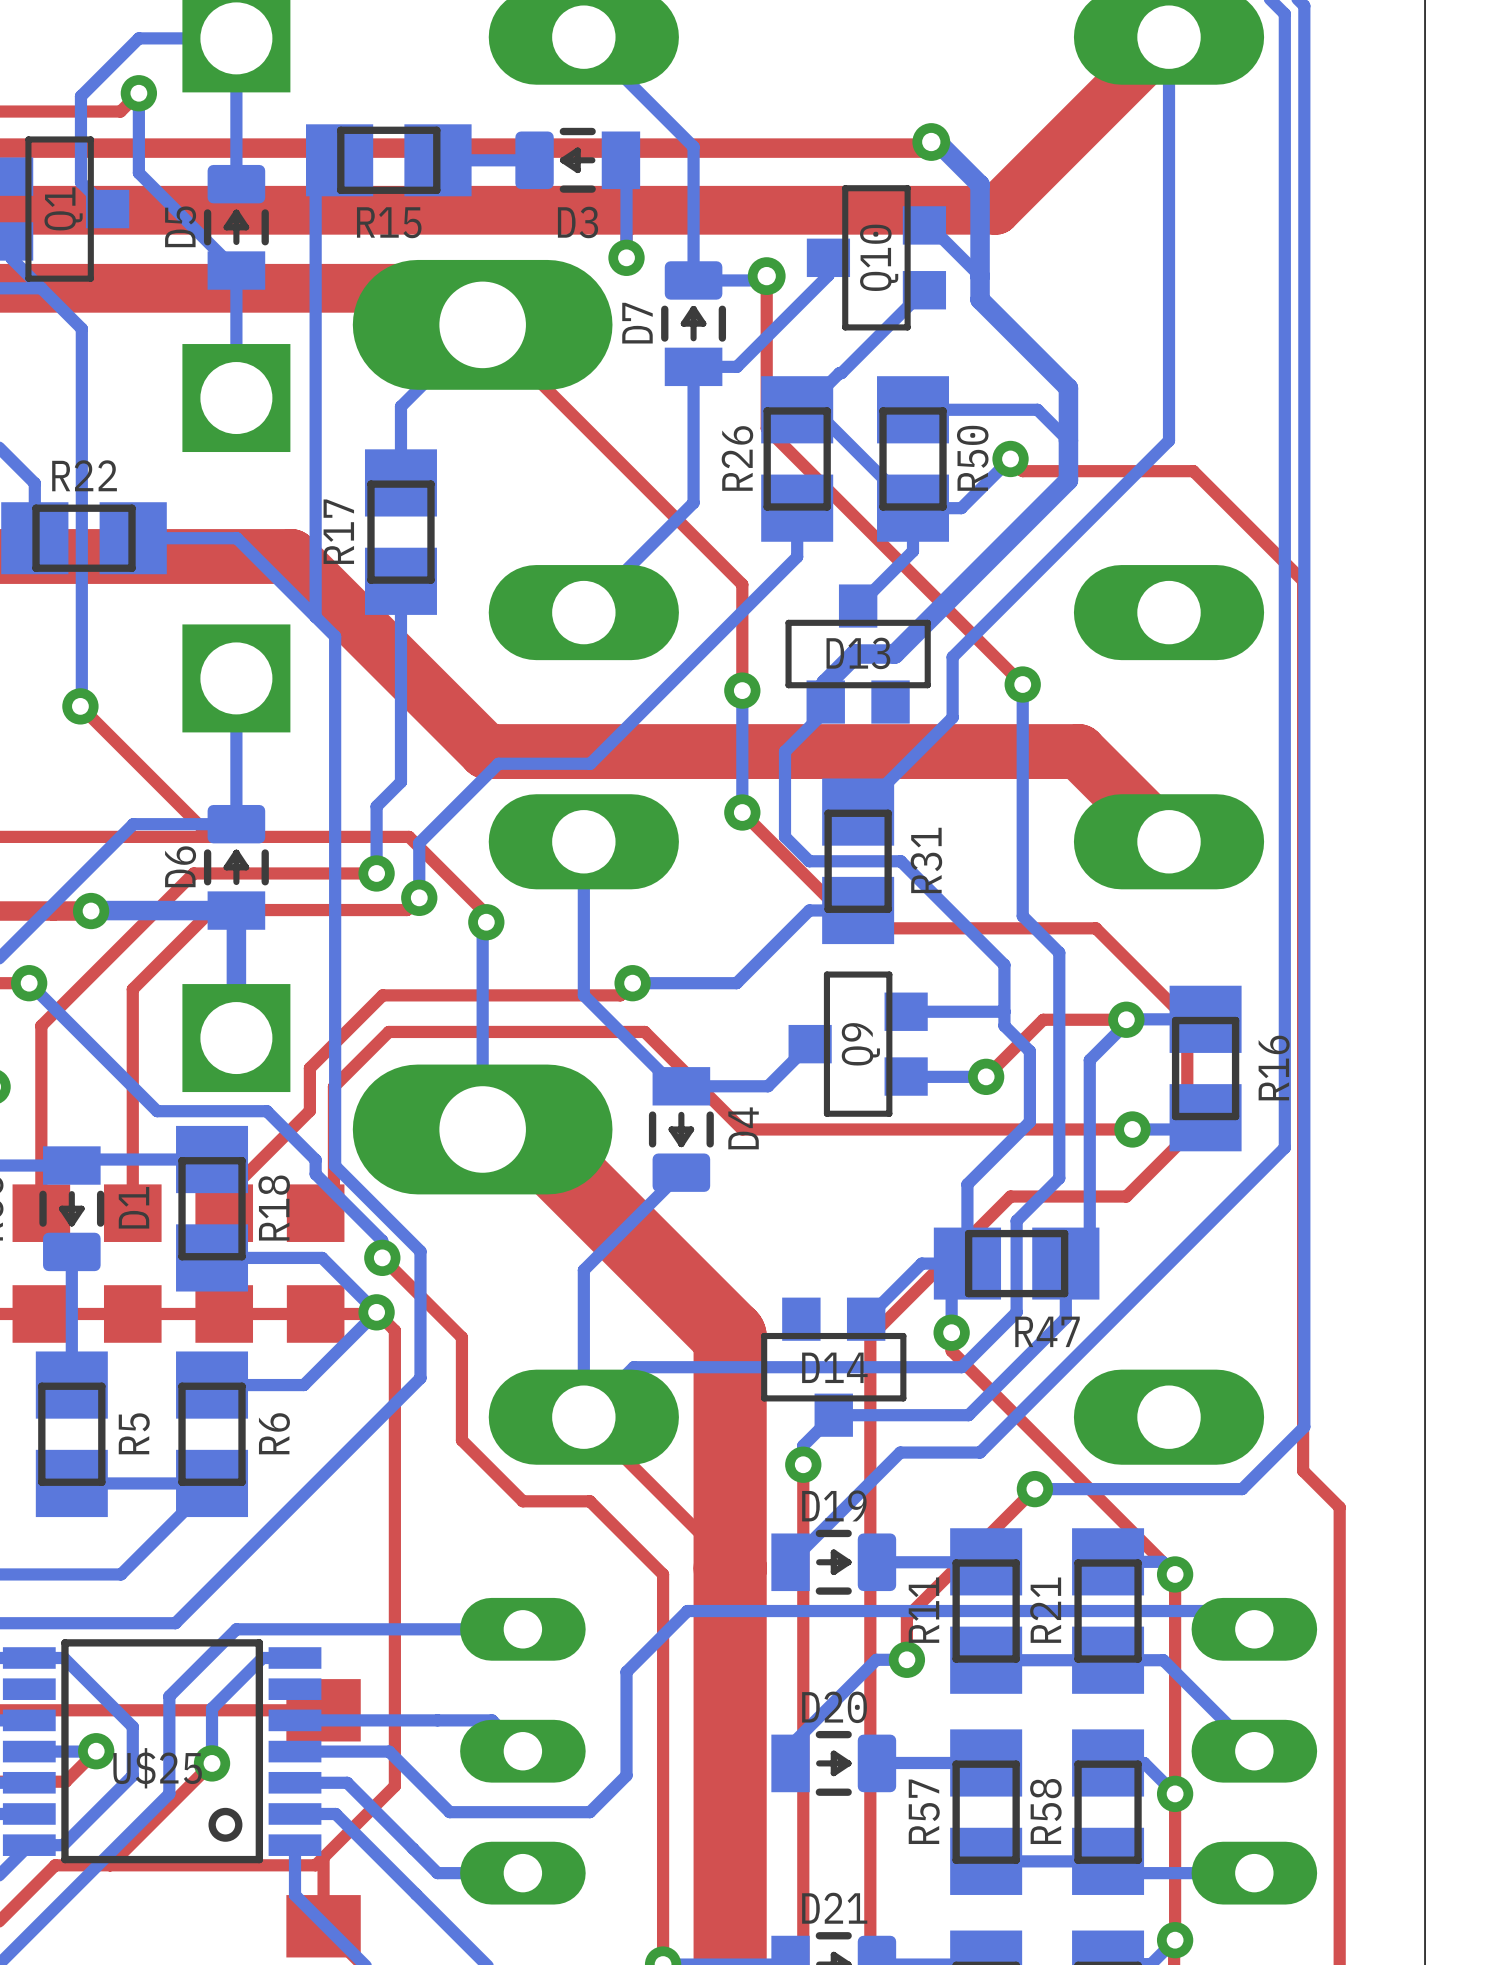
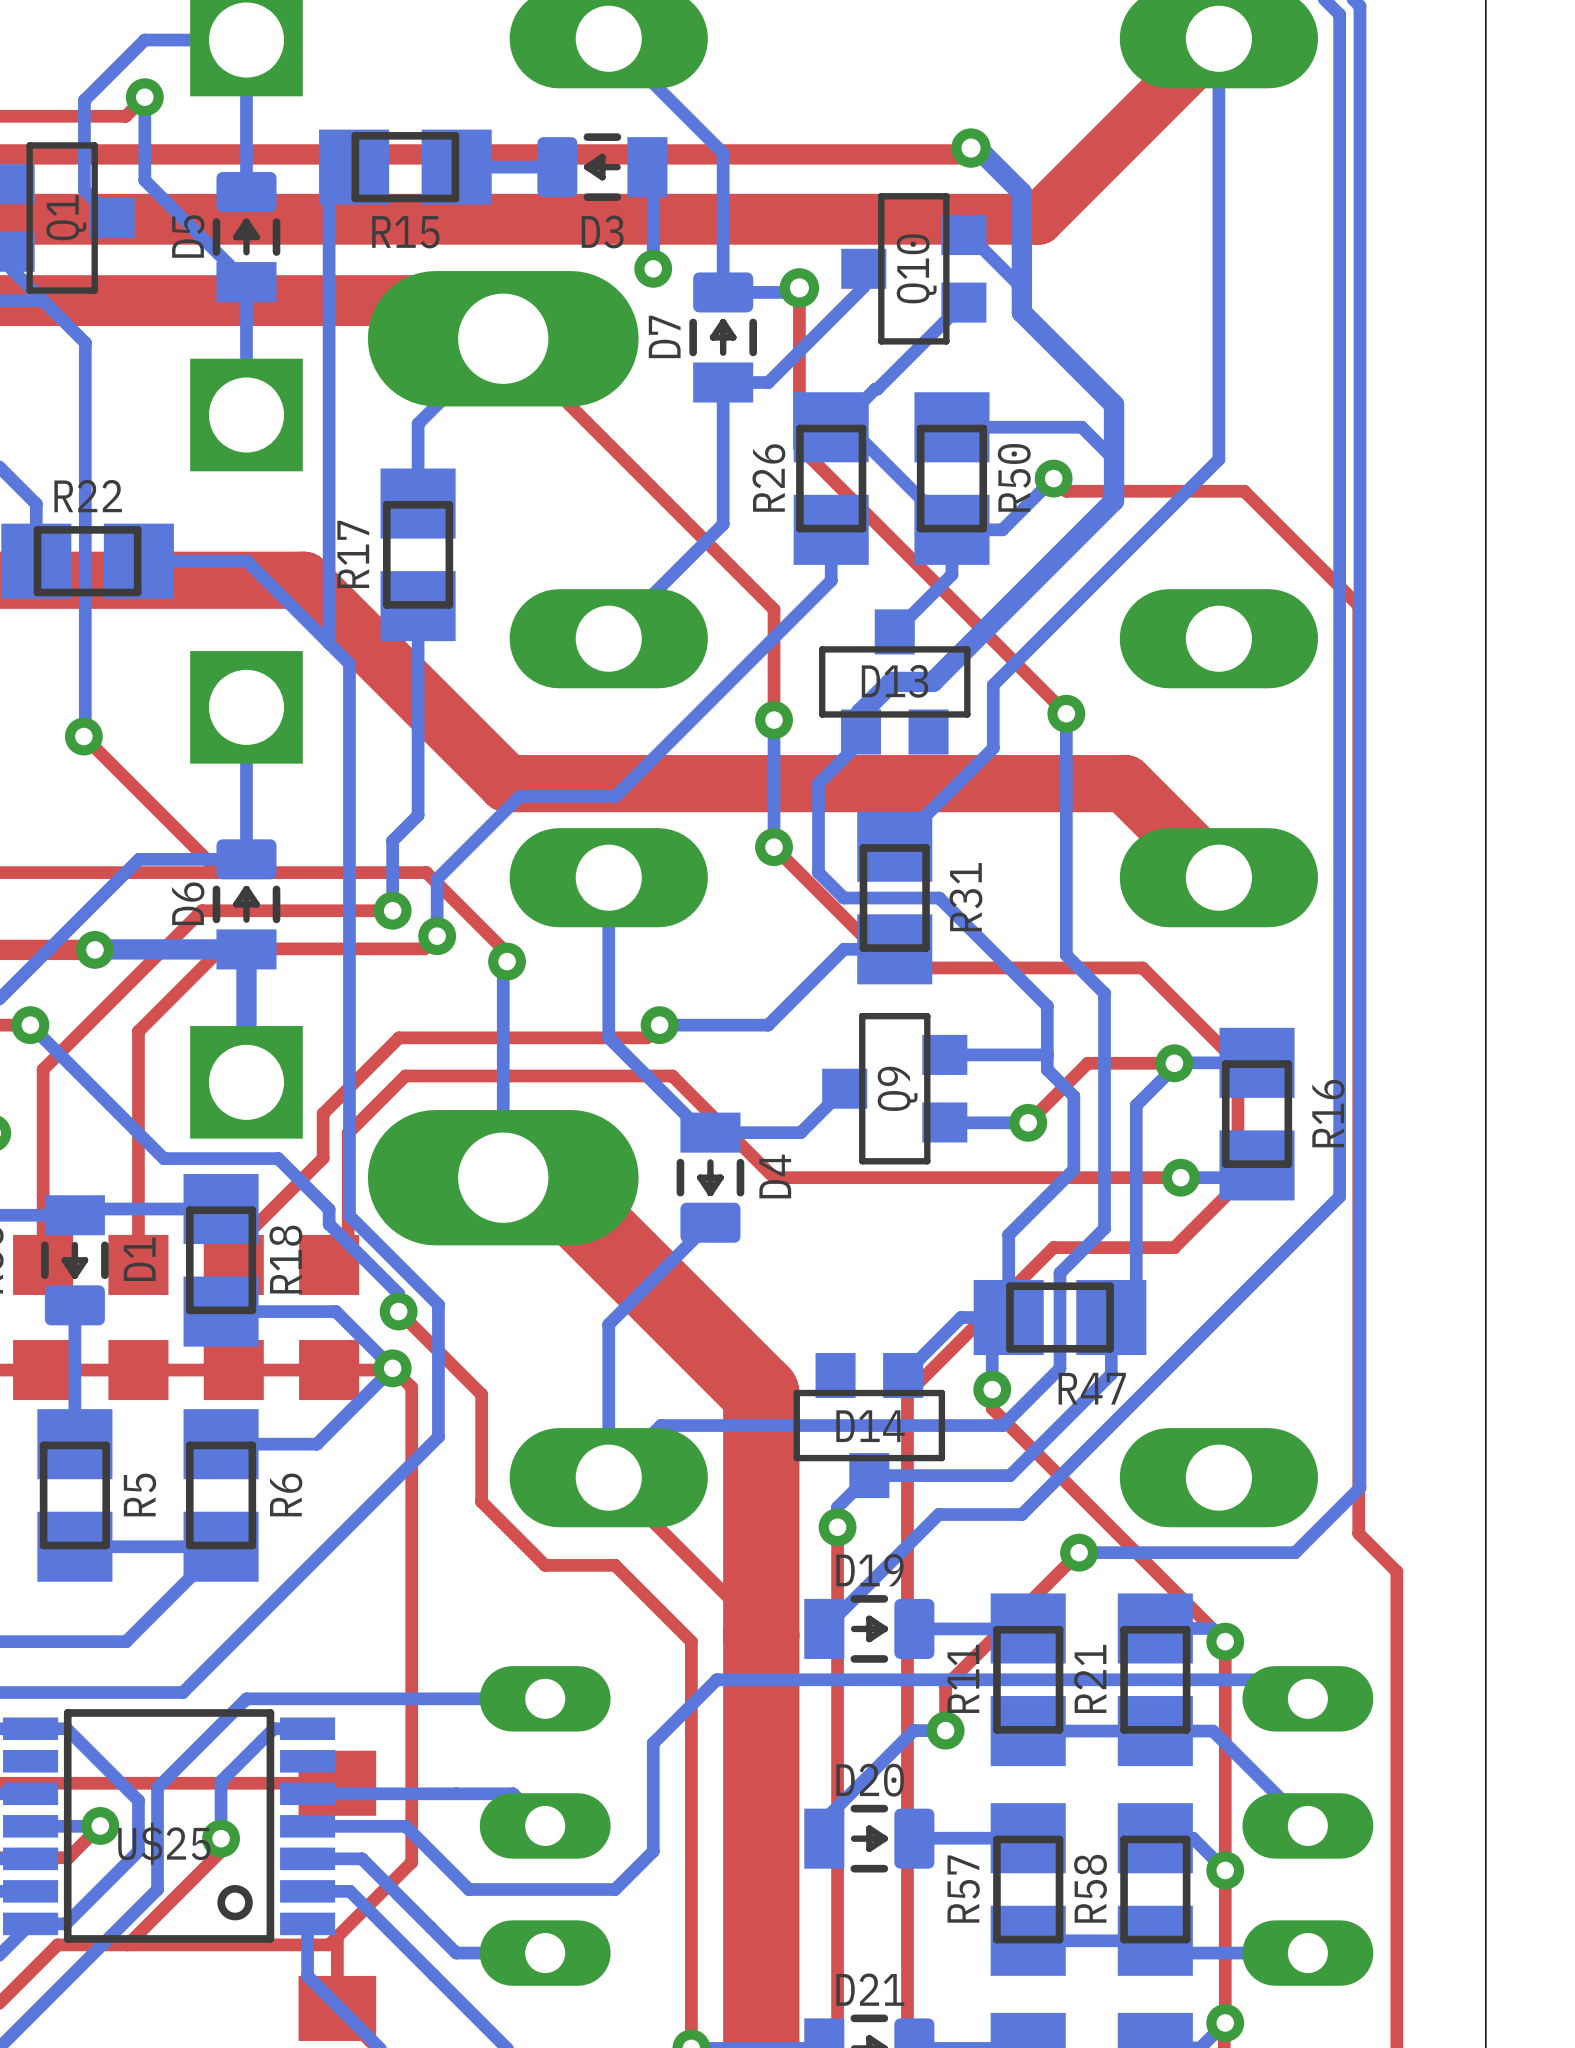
bottom track: (169, 1696) (169, 1793) (151, 1812) -> (176, 1768) (157, 1787) (157, 1889)
top track: (212, 1763) (110, 1865) -> none
top track: none -> (227, 1845) (127, 1944)

